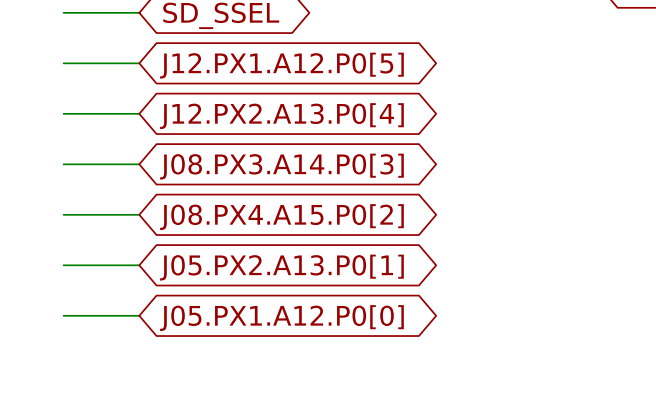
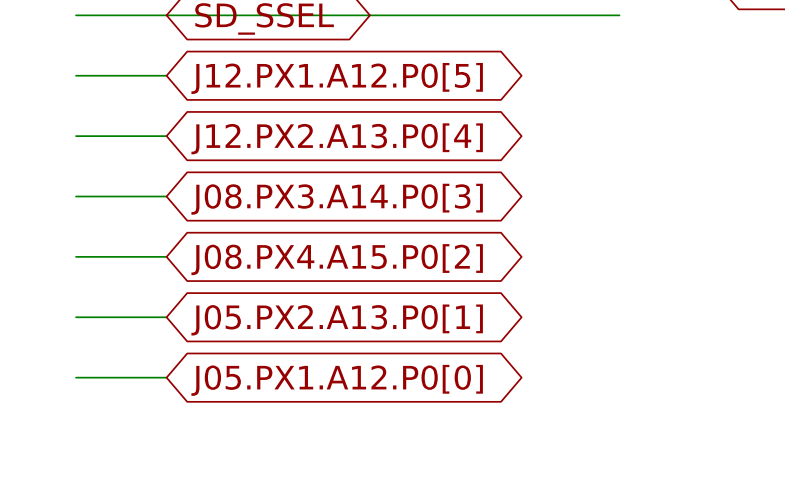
wire: none -> (166, 15) (619, 15)

